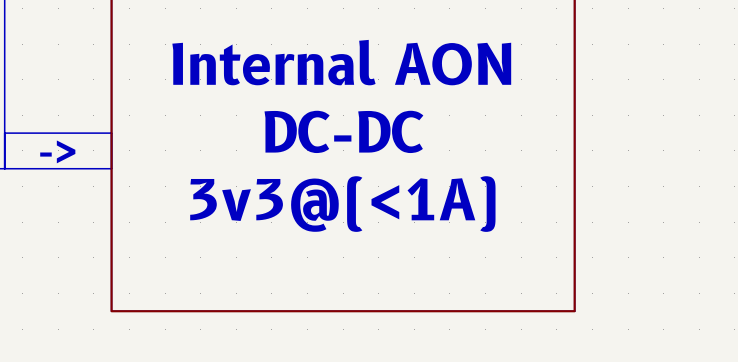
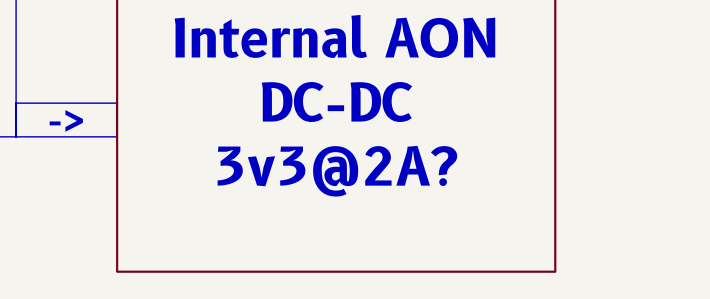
text: 3v3@(<1A) (342, 204) -> 3v3@2A? (337, 171)

